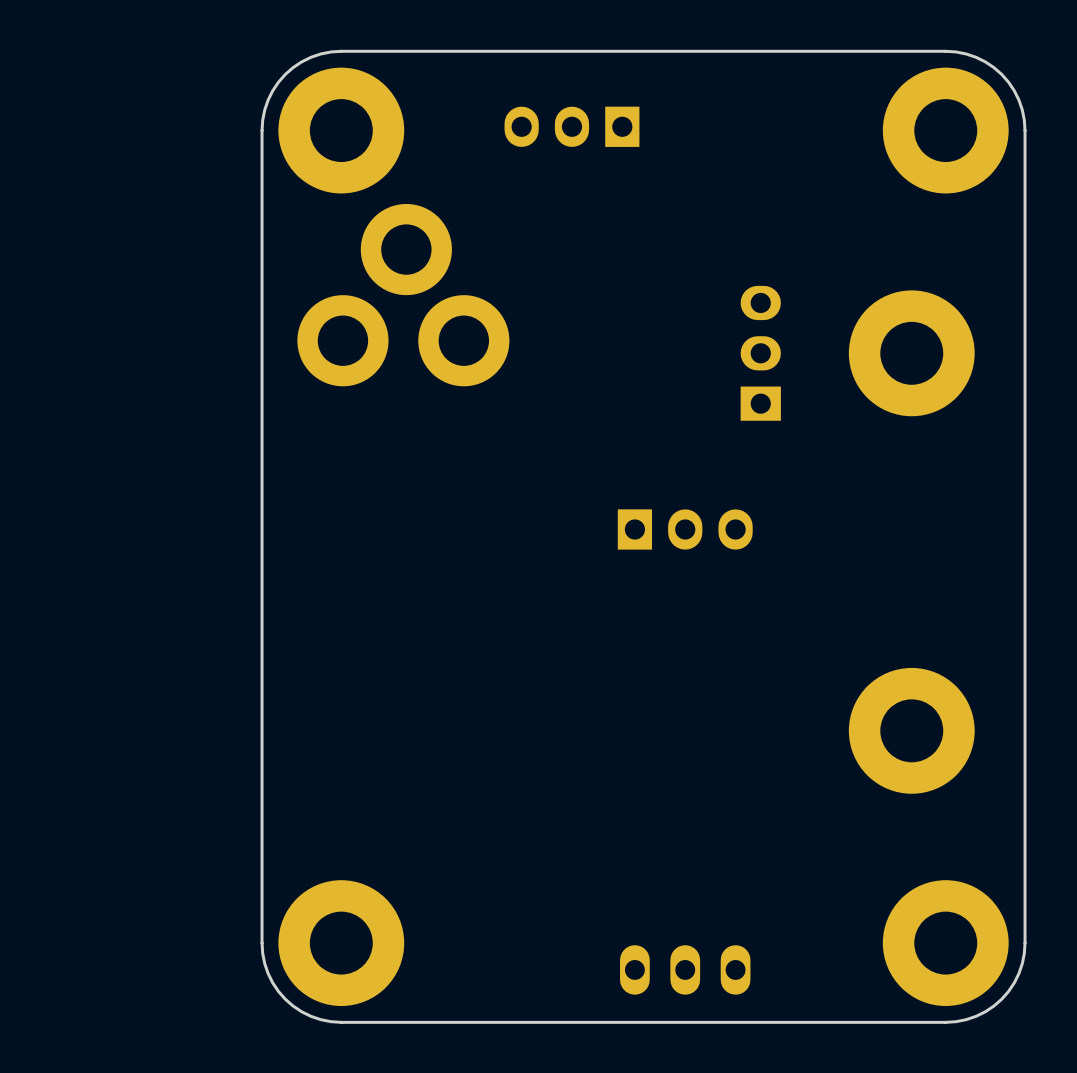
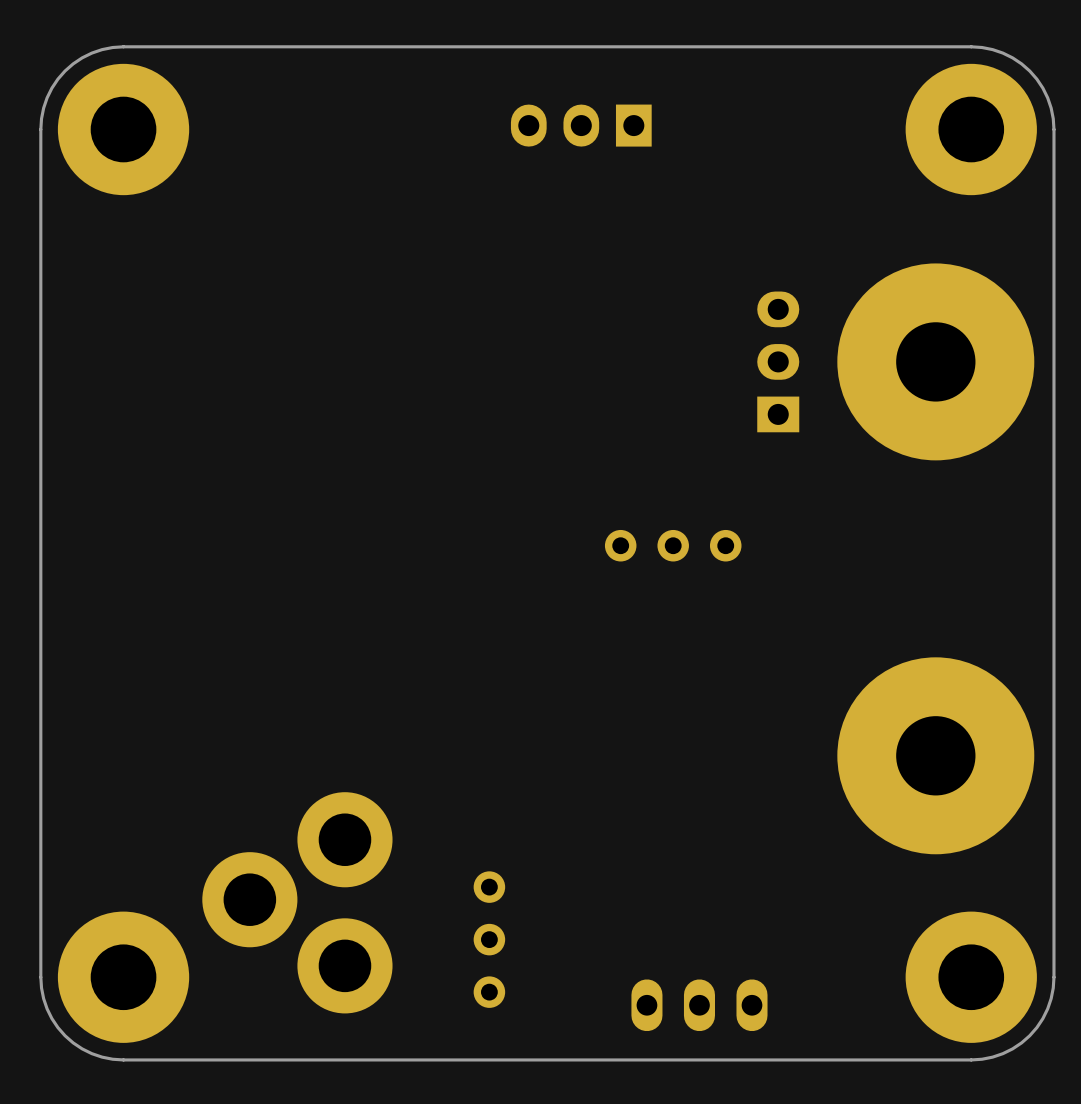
board edge: (341, 51) (310, 57) (285, 74) (268, 100) (262, 130) (262, 953) (272, 982) (285, 999) (310, 1016) (341, 1022) -> (340, 46) (123, 46) (102, 49) (73, 63) (57, 79) (43, 108) (40, 129) (40, 977) (43, 998) (51, 1018) (65, 1035) (82, 1048) (102, 1057) (123, 1059) (340, 1059)
part position: (341, 130) -> (123, 129)
part footprint: [848, 290, 975, 417] -> [837, 263, 1035, 461]
part: (403, 295) -> none
part: none -> (673, 545)
part: (685, 529) -> none
part footprint: [848, 667, 975, 794] -> [837, 657, 1035, 855]
part: none -> (297, 902)
part: none -> (489, 939)
part position: (341, 943) -> (123, 977)

